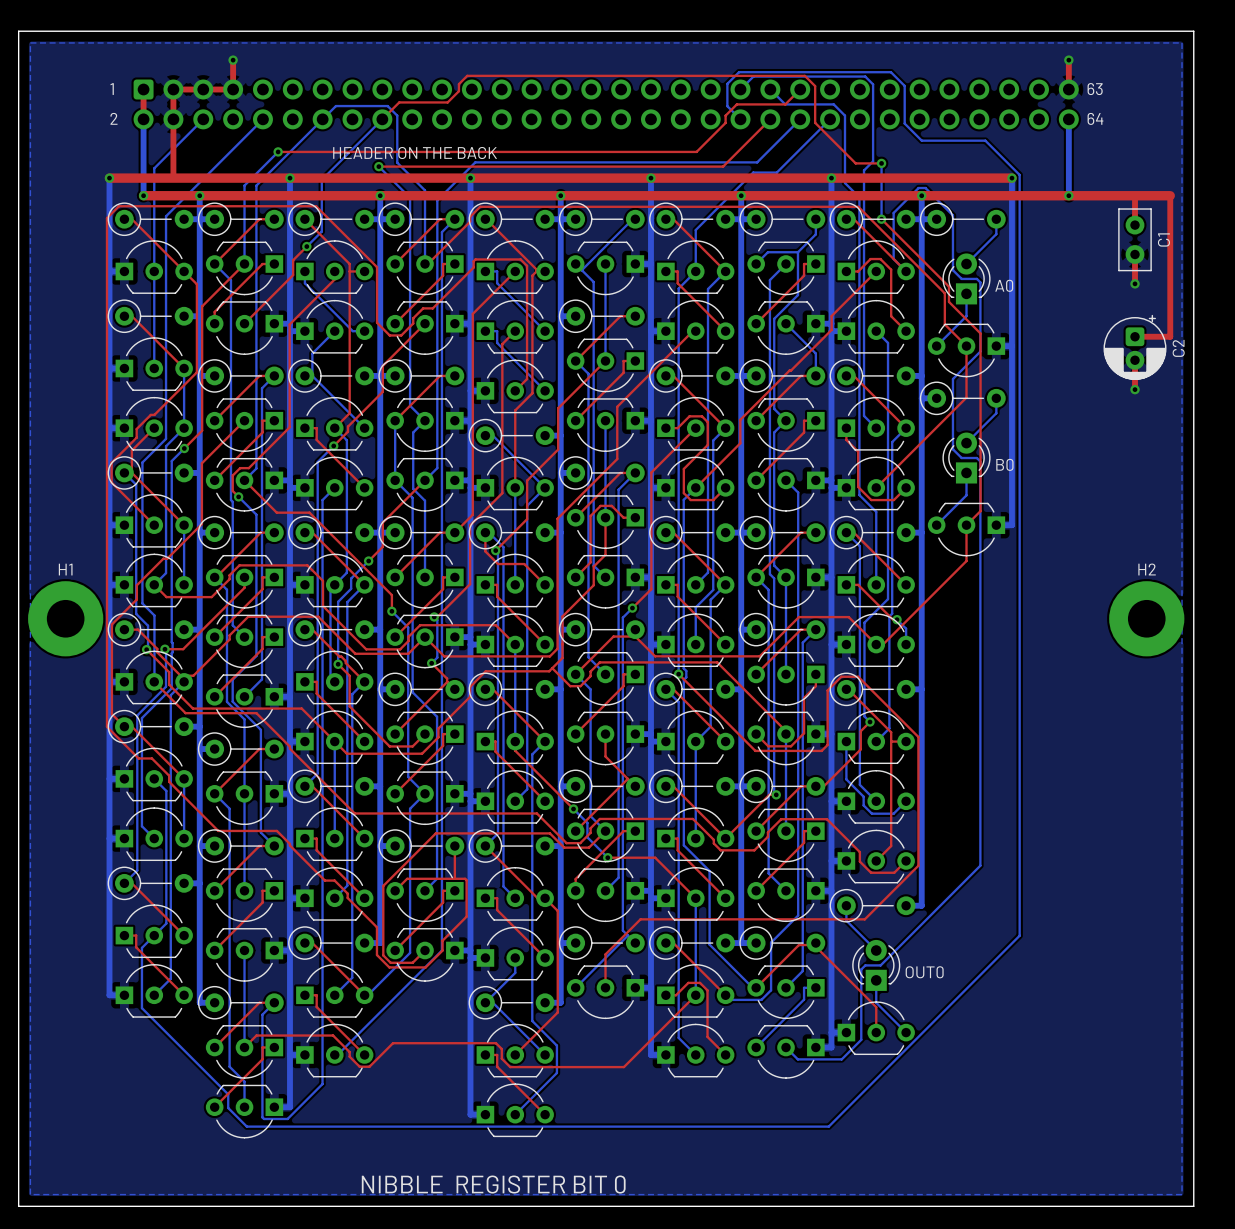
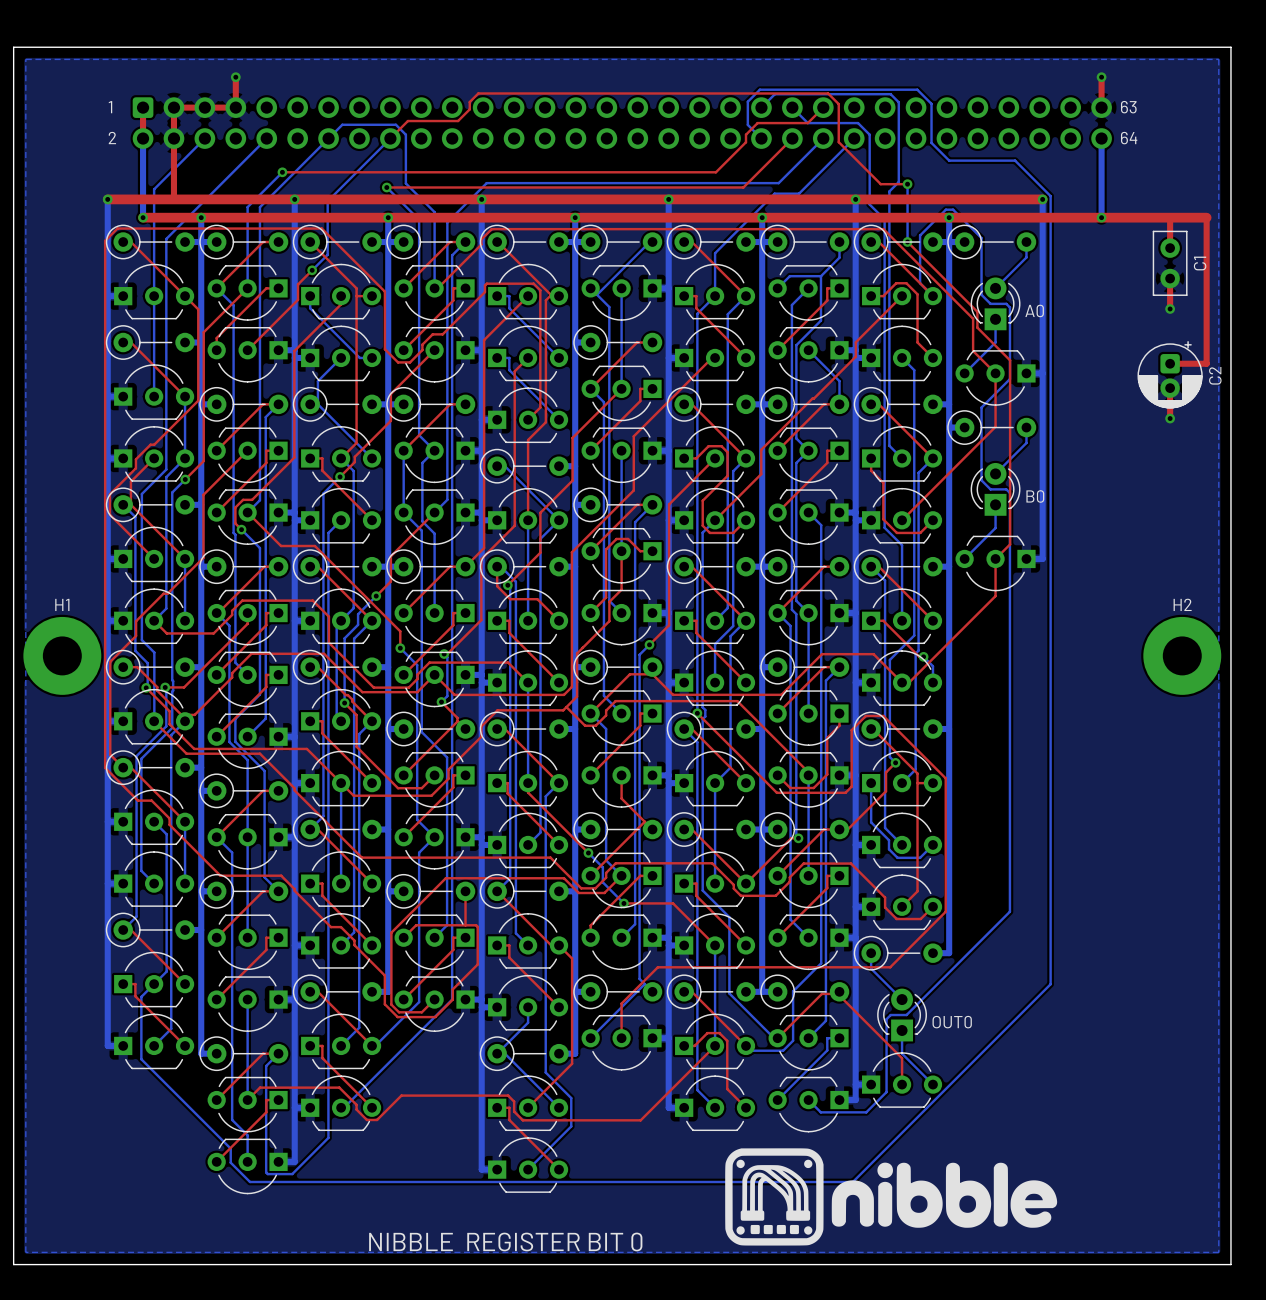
text: HEADER ON THE BACK (415, 153) -> none
drawing: none -> [725, 1148, 1058, 1246]

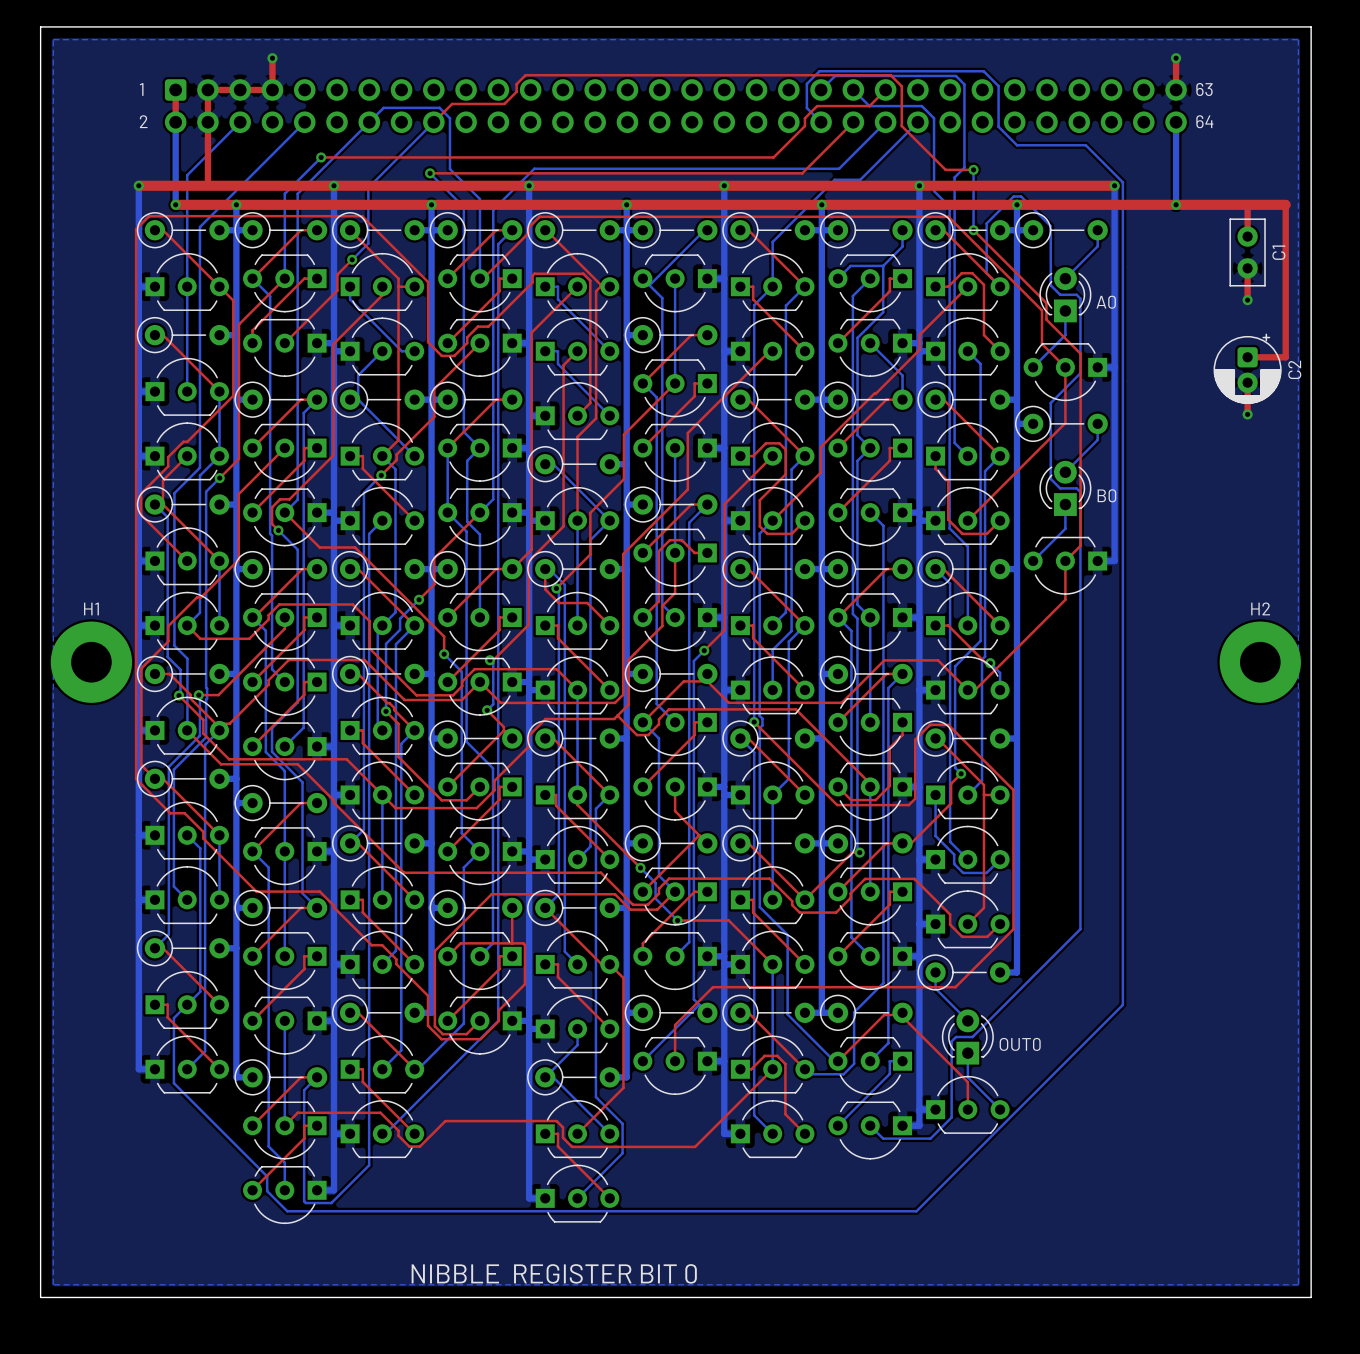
drawing: [725, 1148, 1058, 1246] -> none

